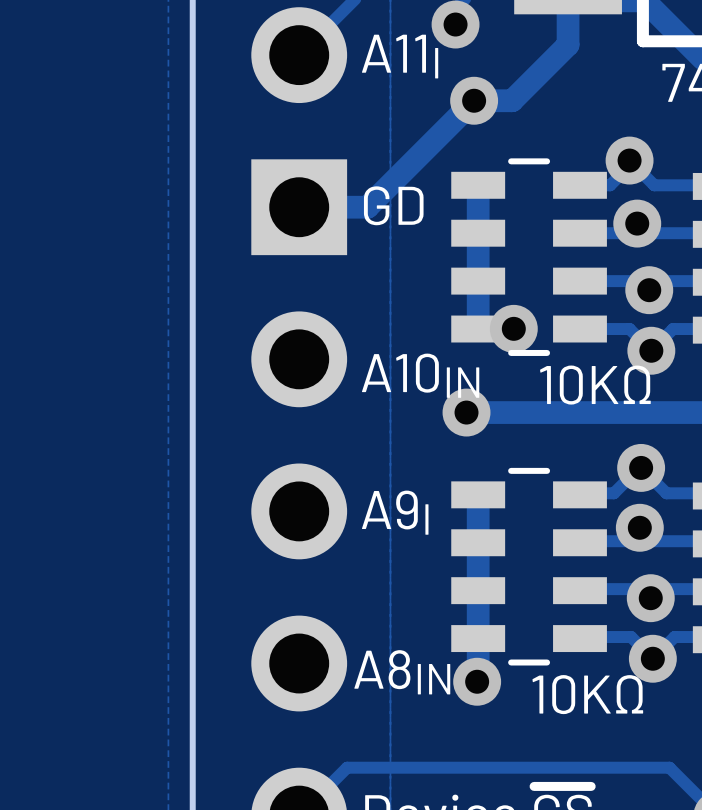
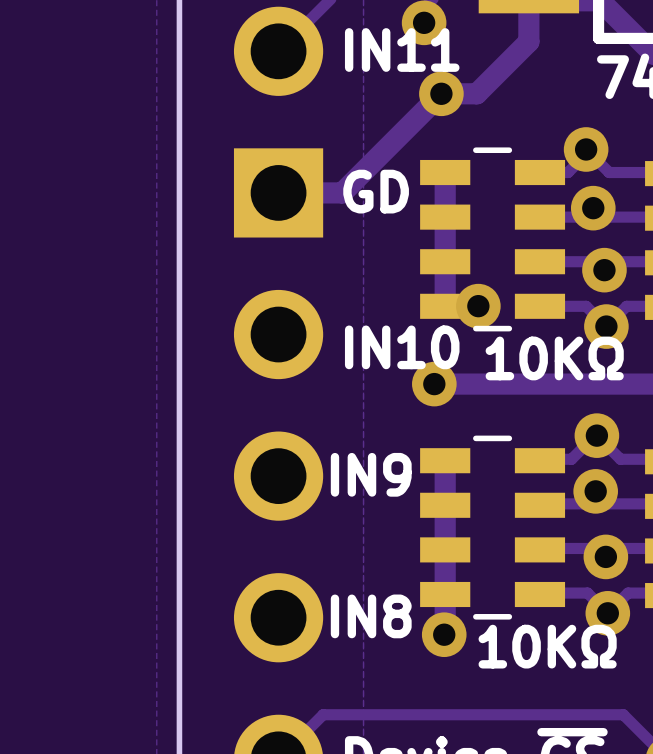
text: A11I (400, 56) -> IN11 (402, 50)
text: A10IN (420, 375) -> IN10 (402, 347)
text: A9I (395, 512) -> IN9 (371, 474)
text: A8IN (402, 672) -> IN8 (371, 616)

